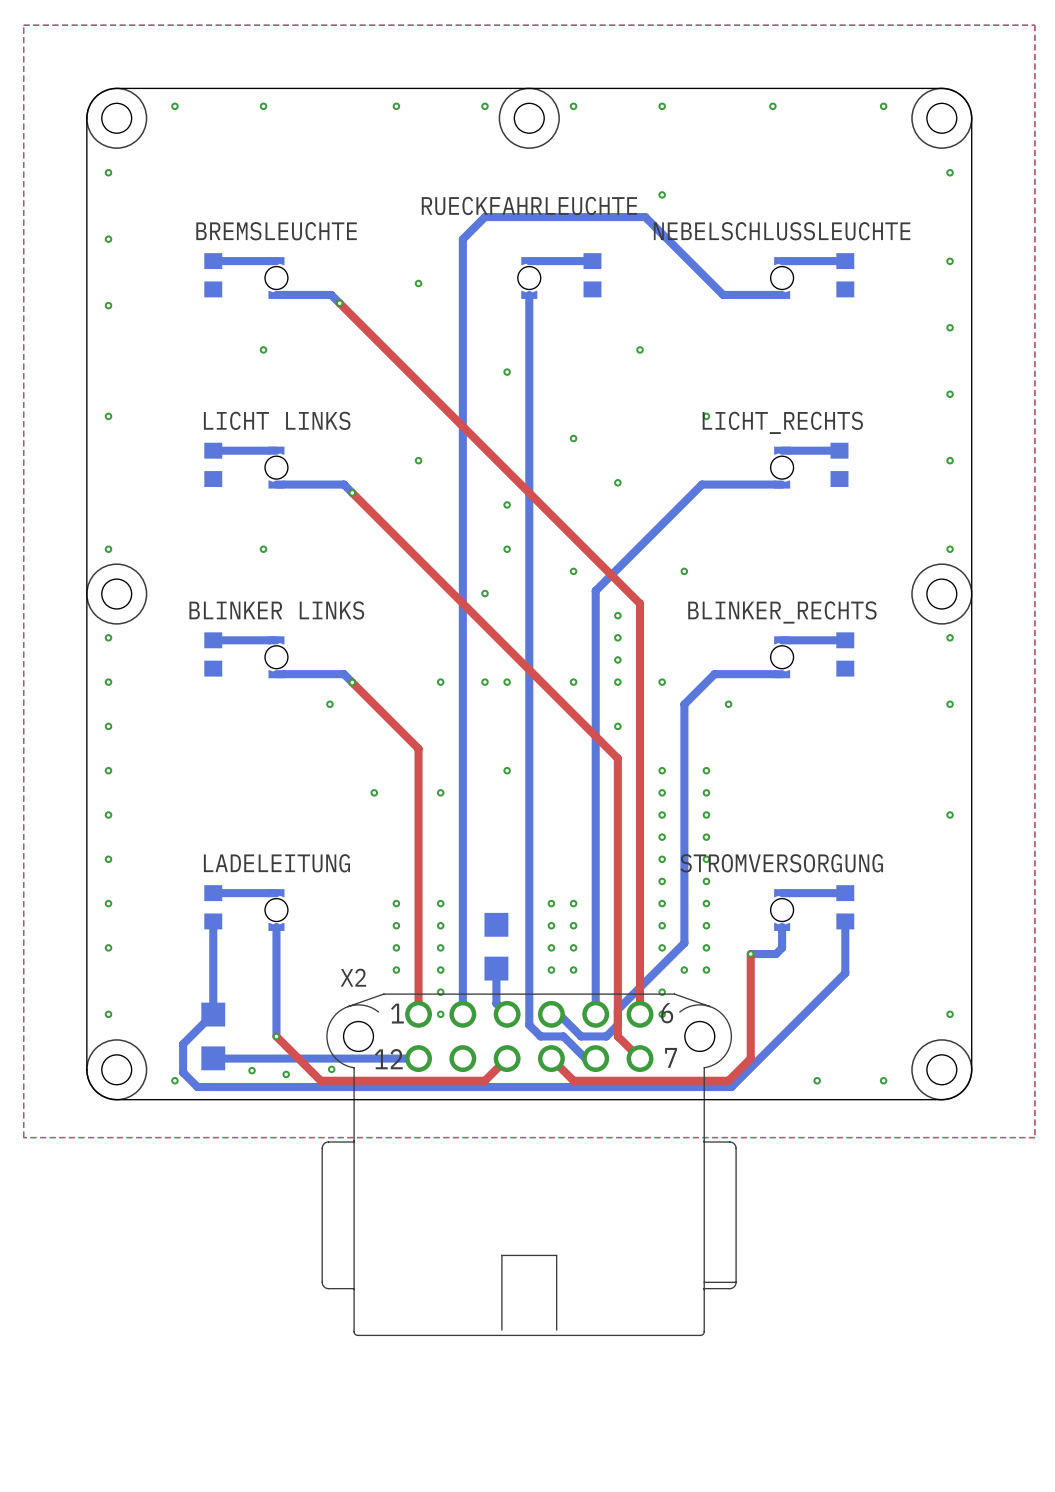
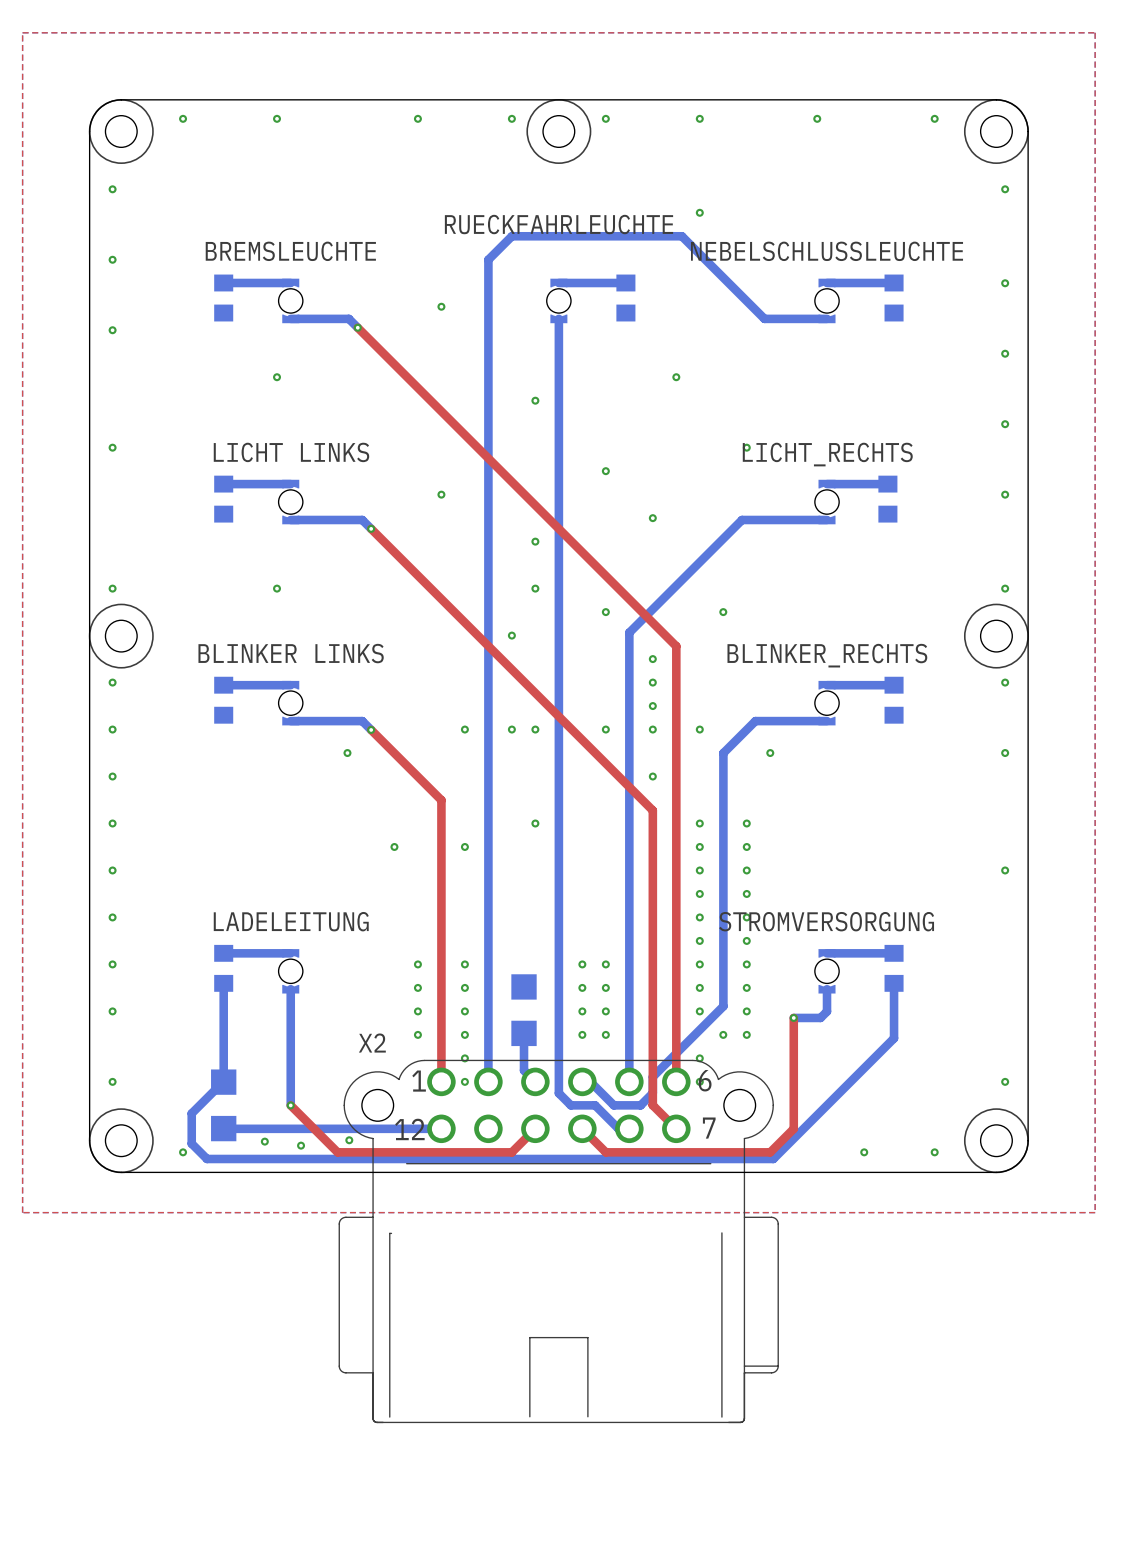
X2 footprint: [321, 993, 737, 1336] -> [338, 1059, 779, 1423]

